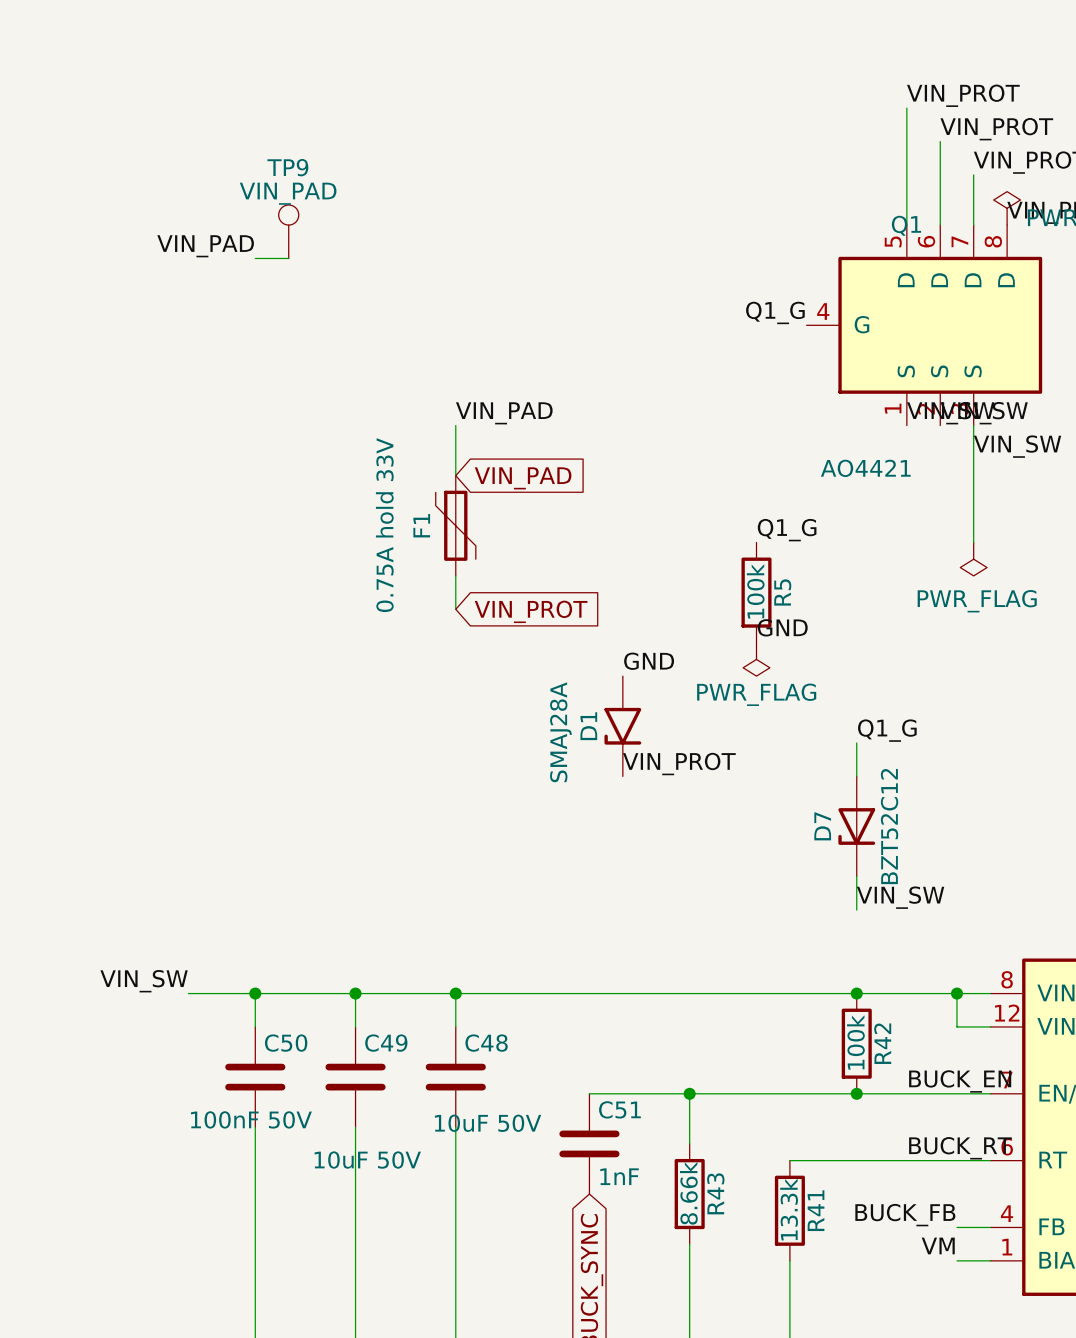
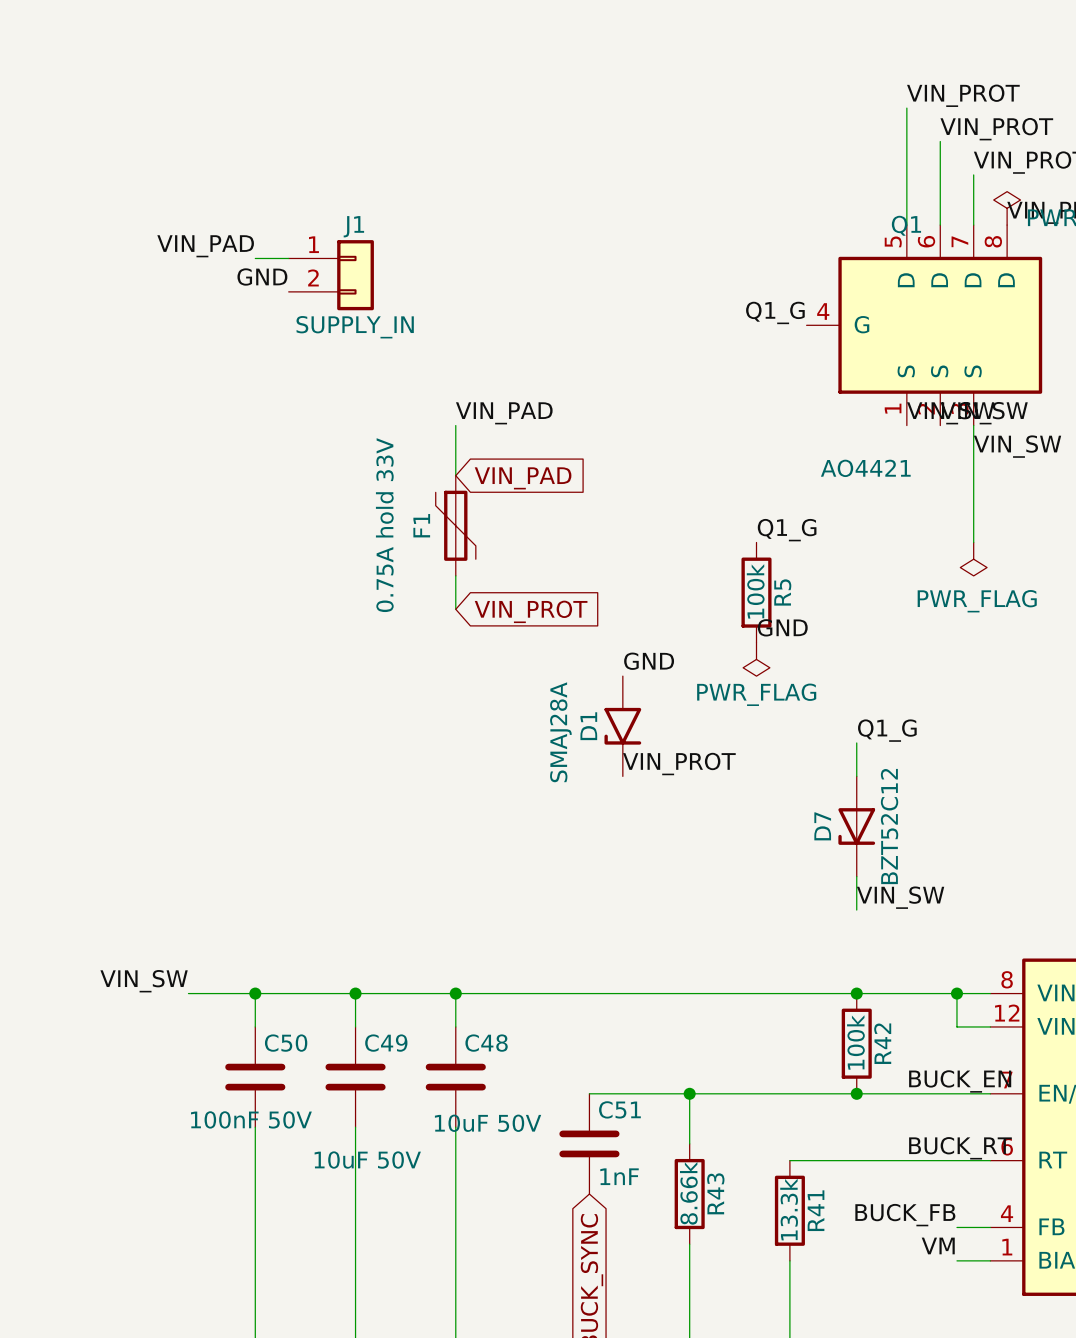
TP9: VIN_PAD (288, 231) -> none
J1: none -> SUPPLY_IN (331, 275)
label: none -> GND (262, 276)

